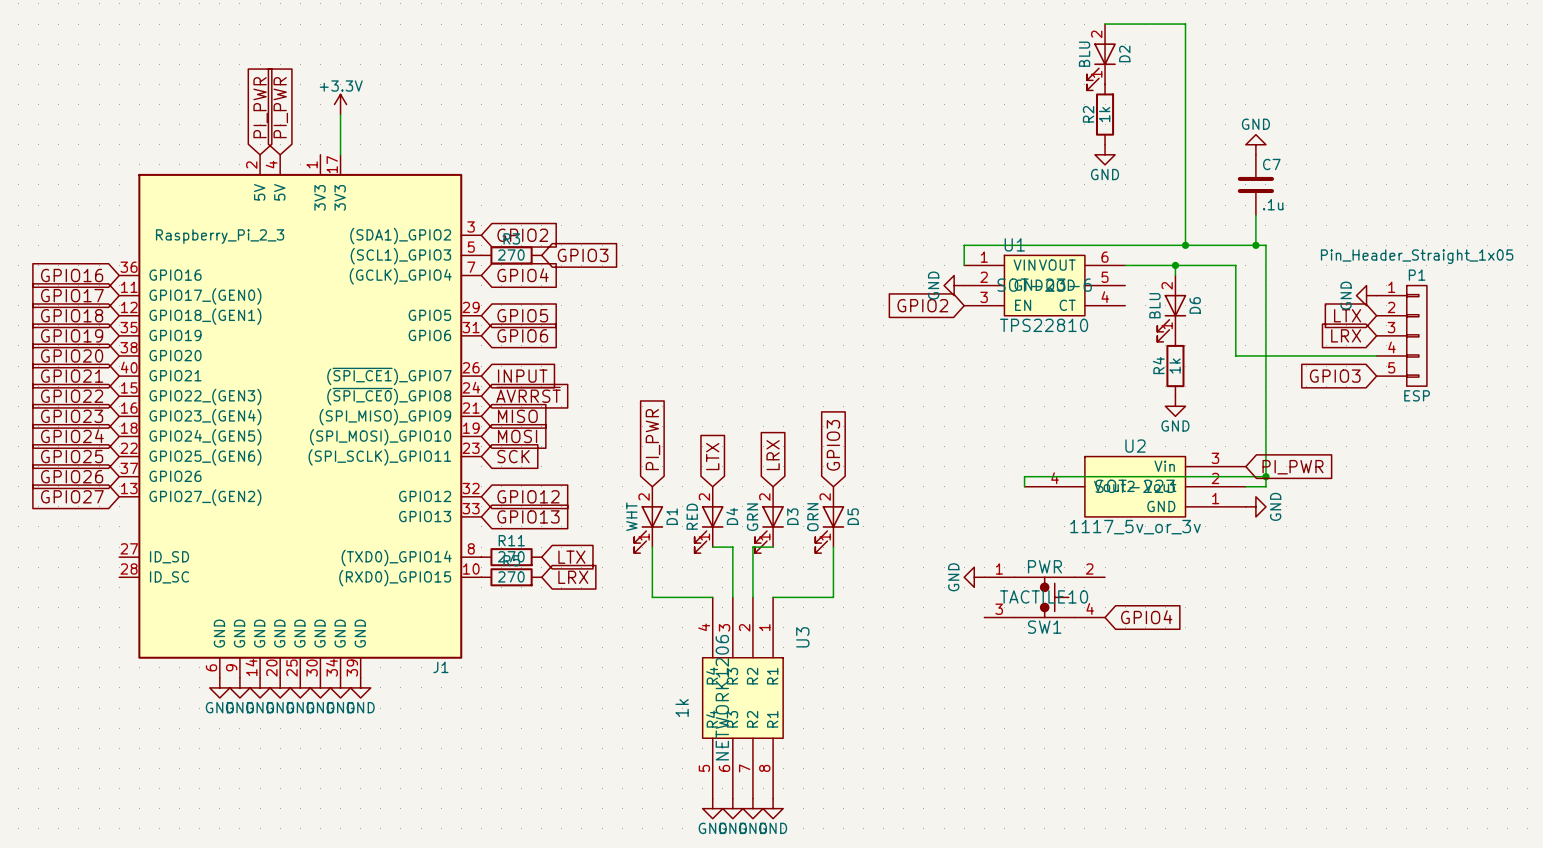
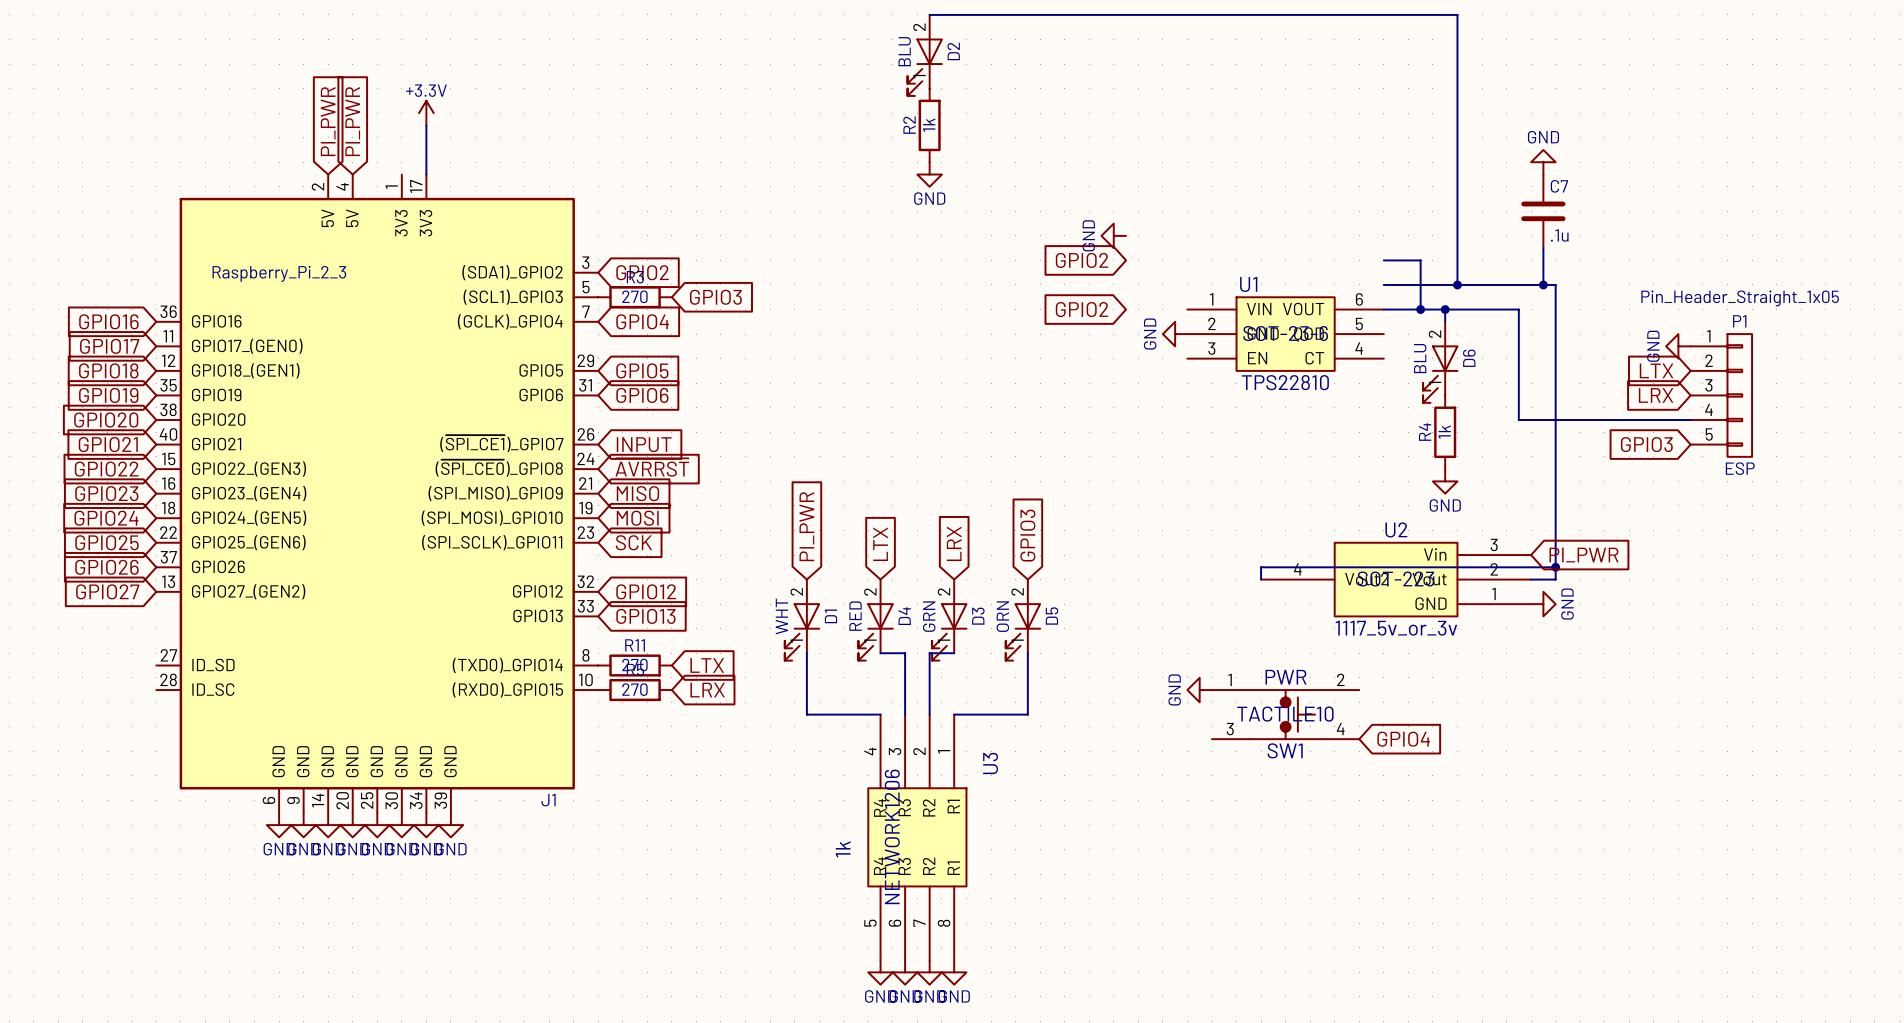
wire: none -> (929, 14) (1359, 14)
D2 position: (1101, 57) -> (925, 55)
R2 position: (1105, 114) -> (929, 125)
power symbol: none -> GND (929, 174)
power symbol: GND (1105, 154) -> none
power symbol: none -> GND (1113, 235)
global label: none -> GPIO2 (1082, 260)
wire: none -> (1383, 260) (1420, 260) (1420, 309)
wire: (1125, 245) (964, 245) (964, 265) -> none
global label: none -> GPIO2 (1082, 309)
junction: none -> (1420, 309)
global label: GPIO2 (922, 305) -> none

